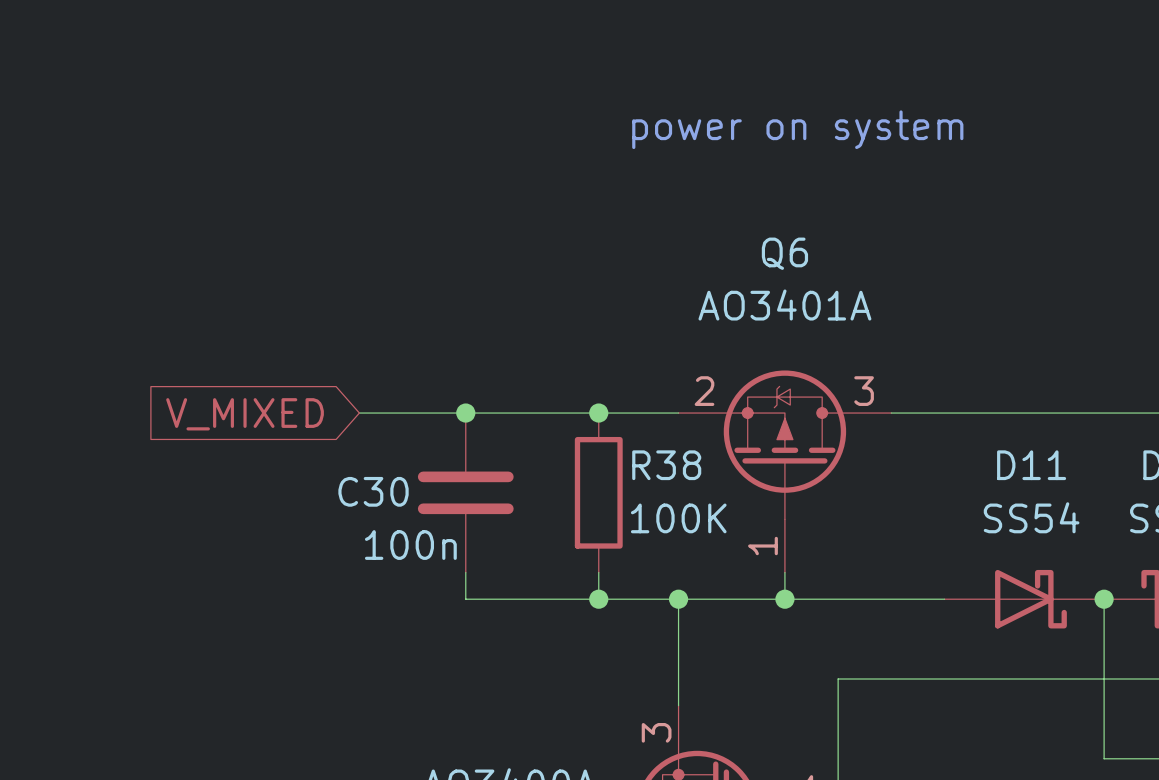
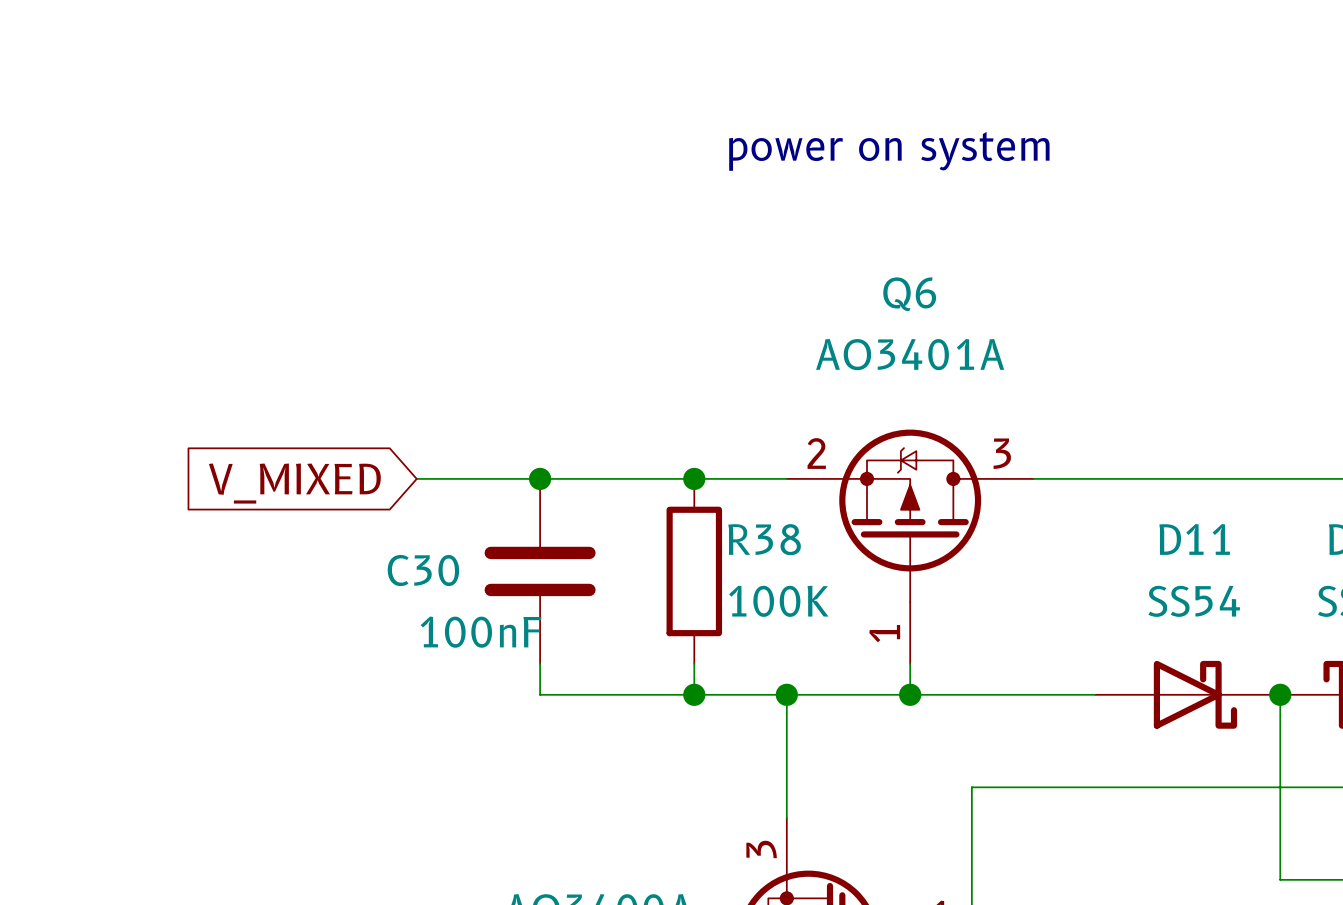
C30 value: 100n (410, 545) -> 100nF (481, 632)

